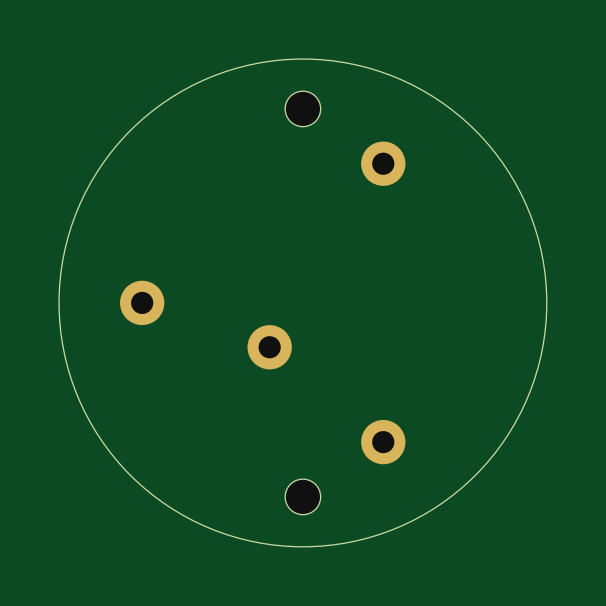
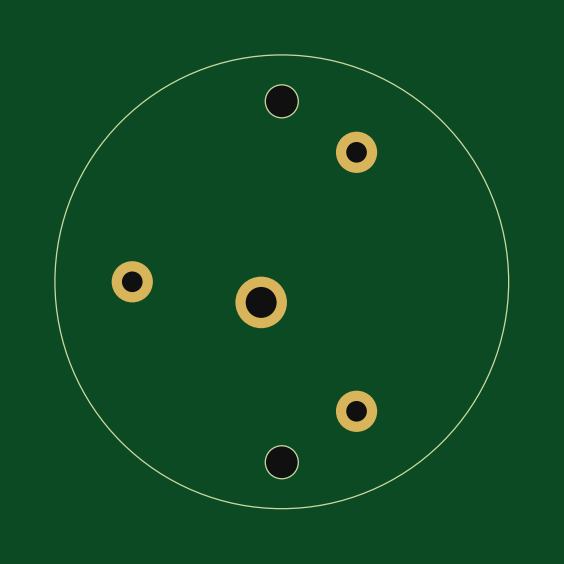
part: none -> (261, 302)
part: (269, 347) -> none

